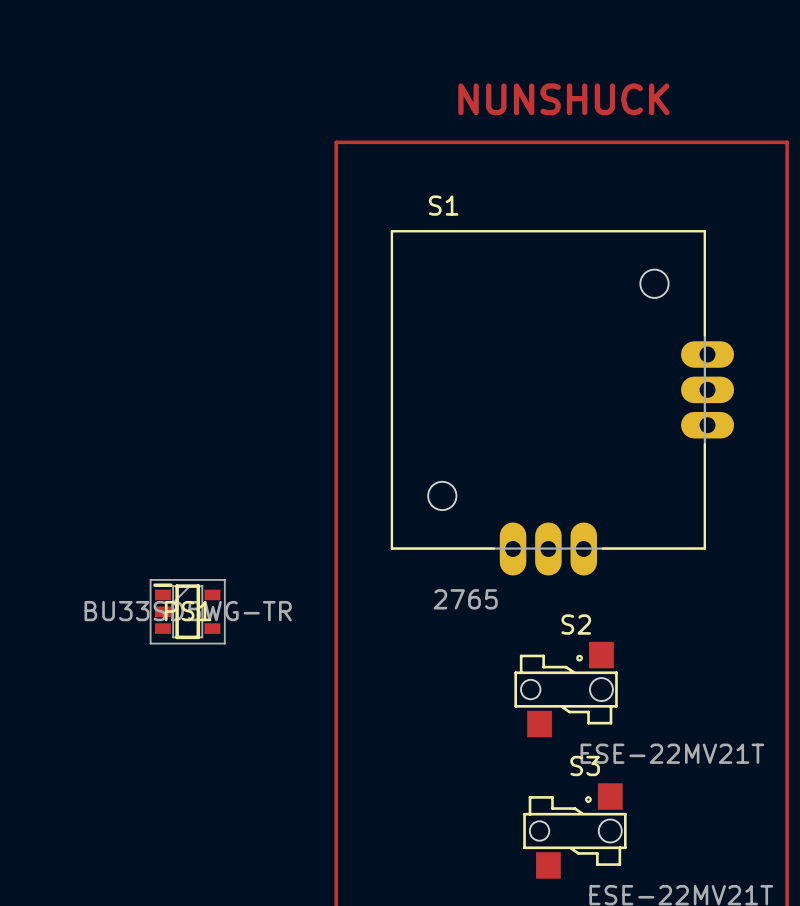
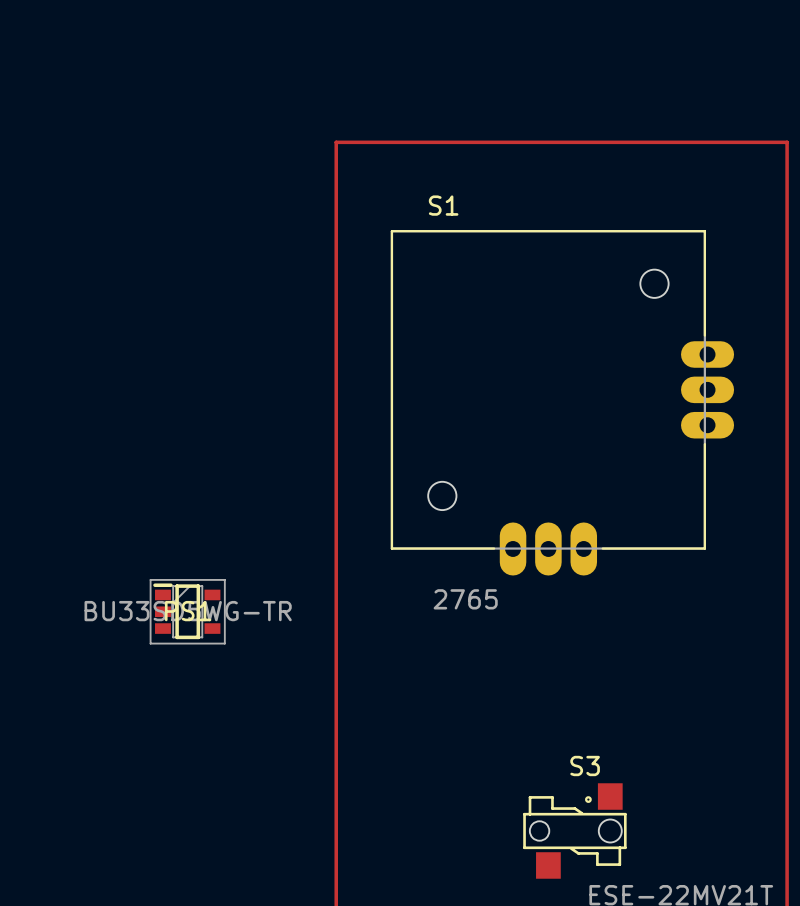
text: NUNSHUCK (563, 99) -> none
S2: ESE-22MV21T (566, 689) -> none

